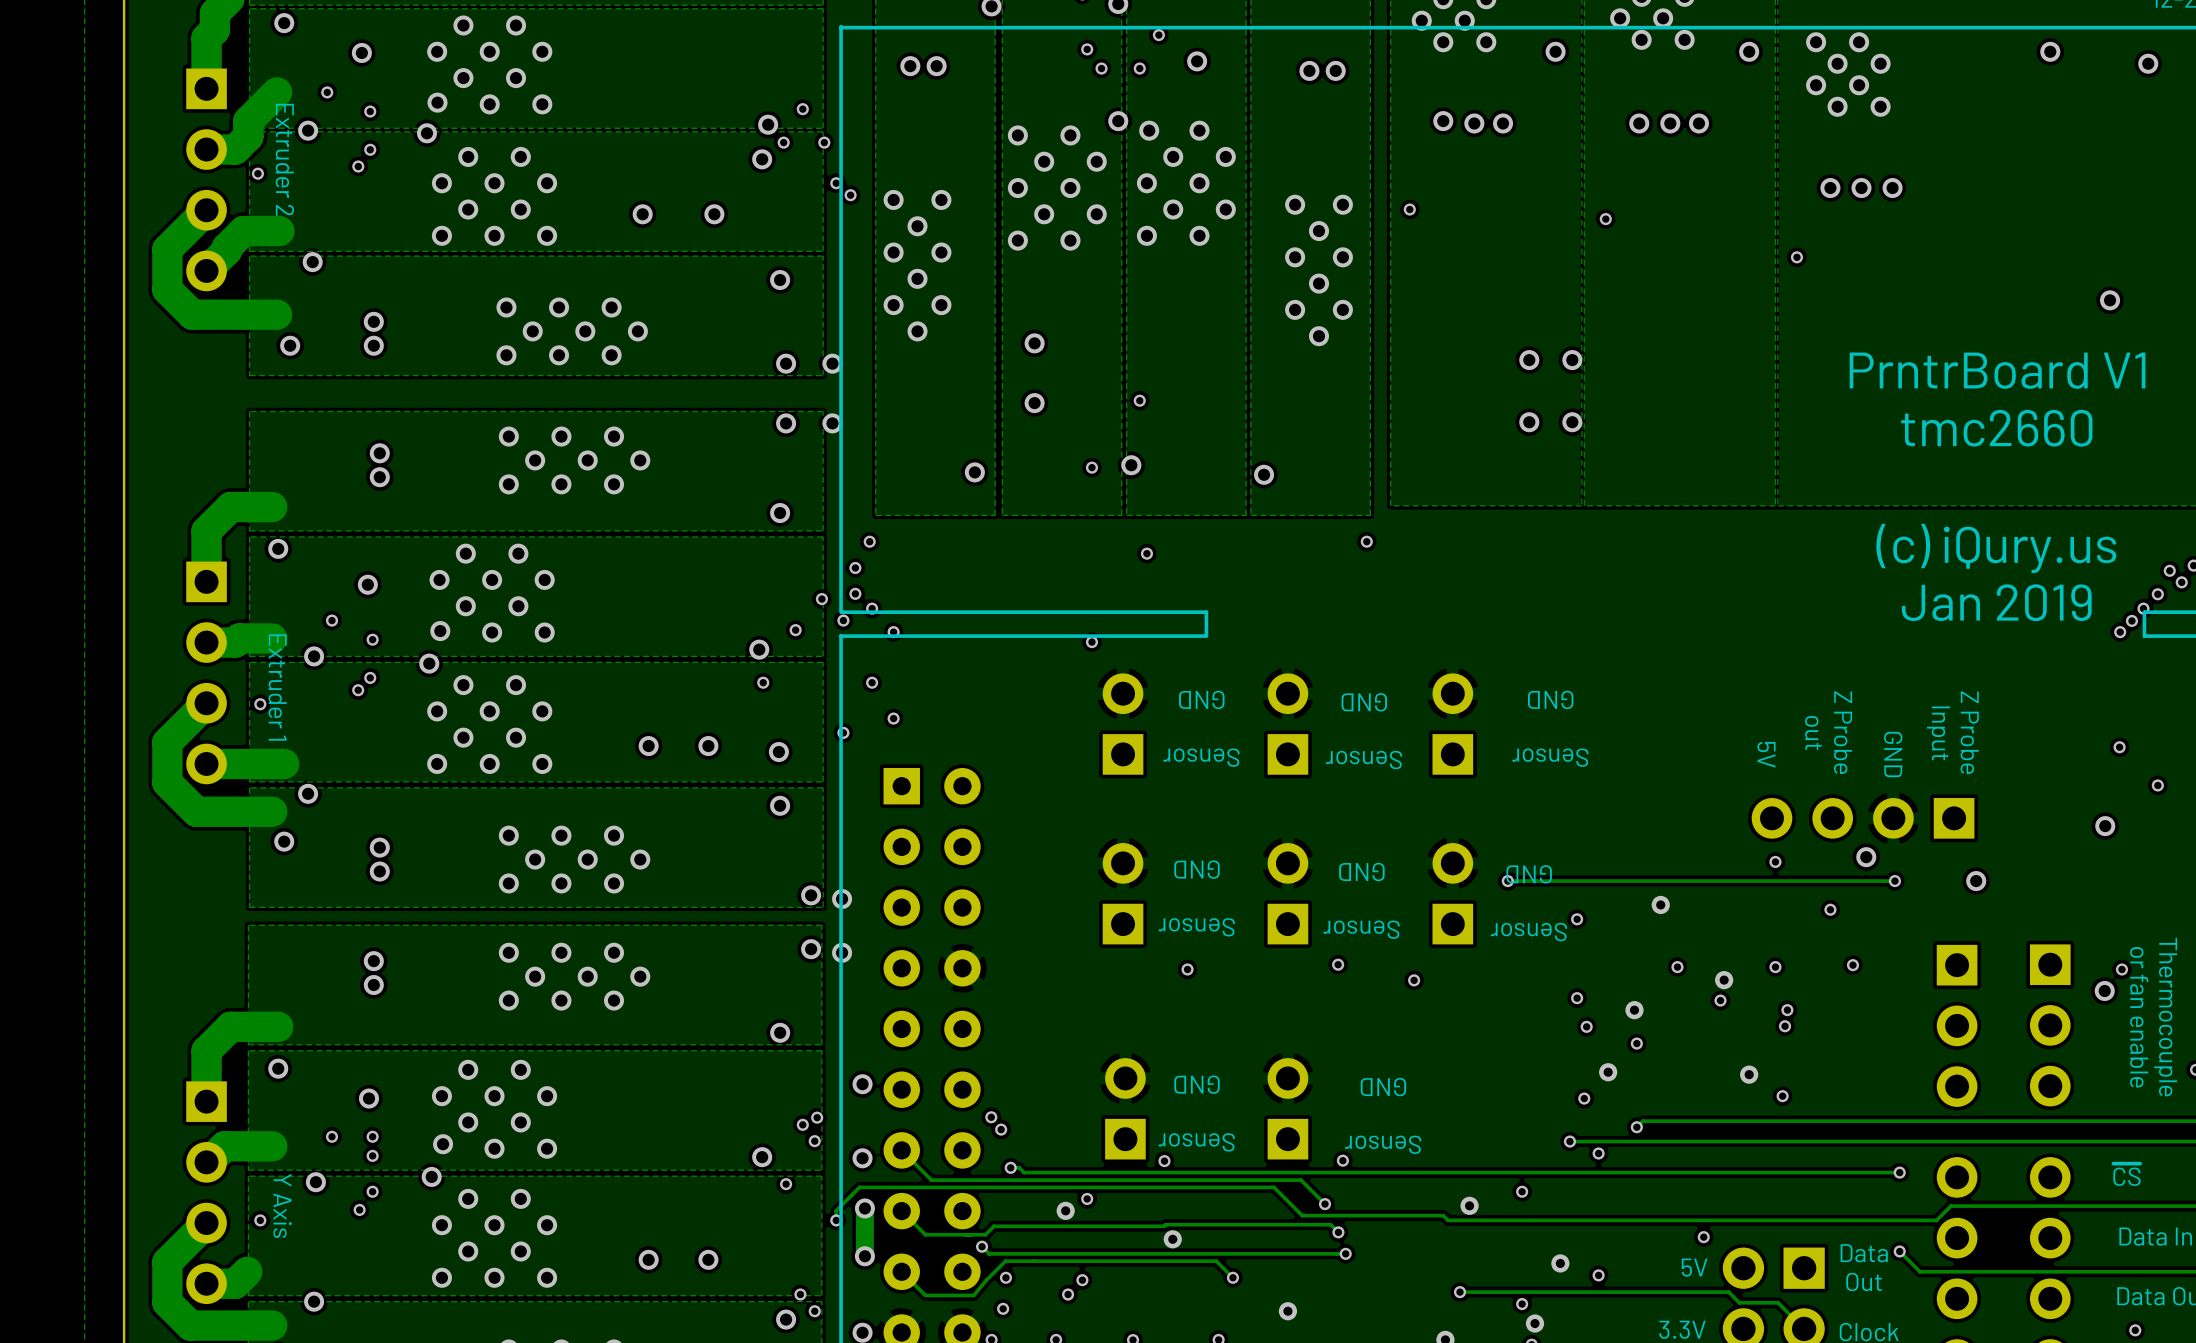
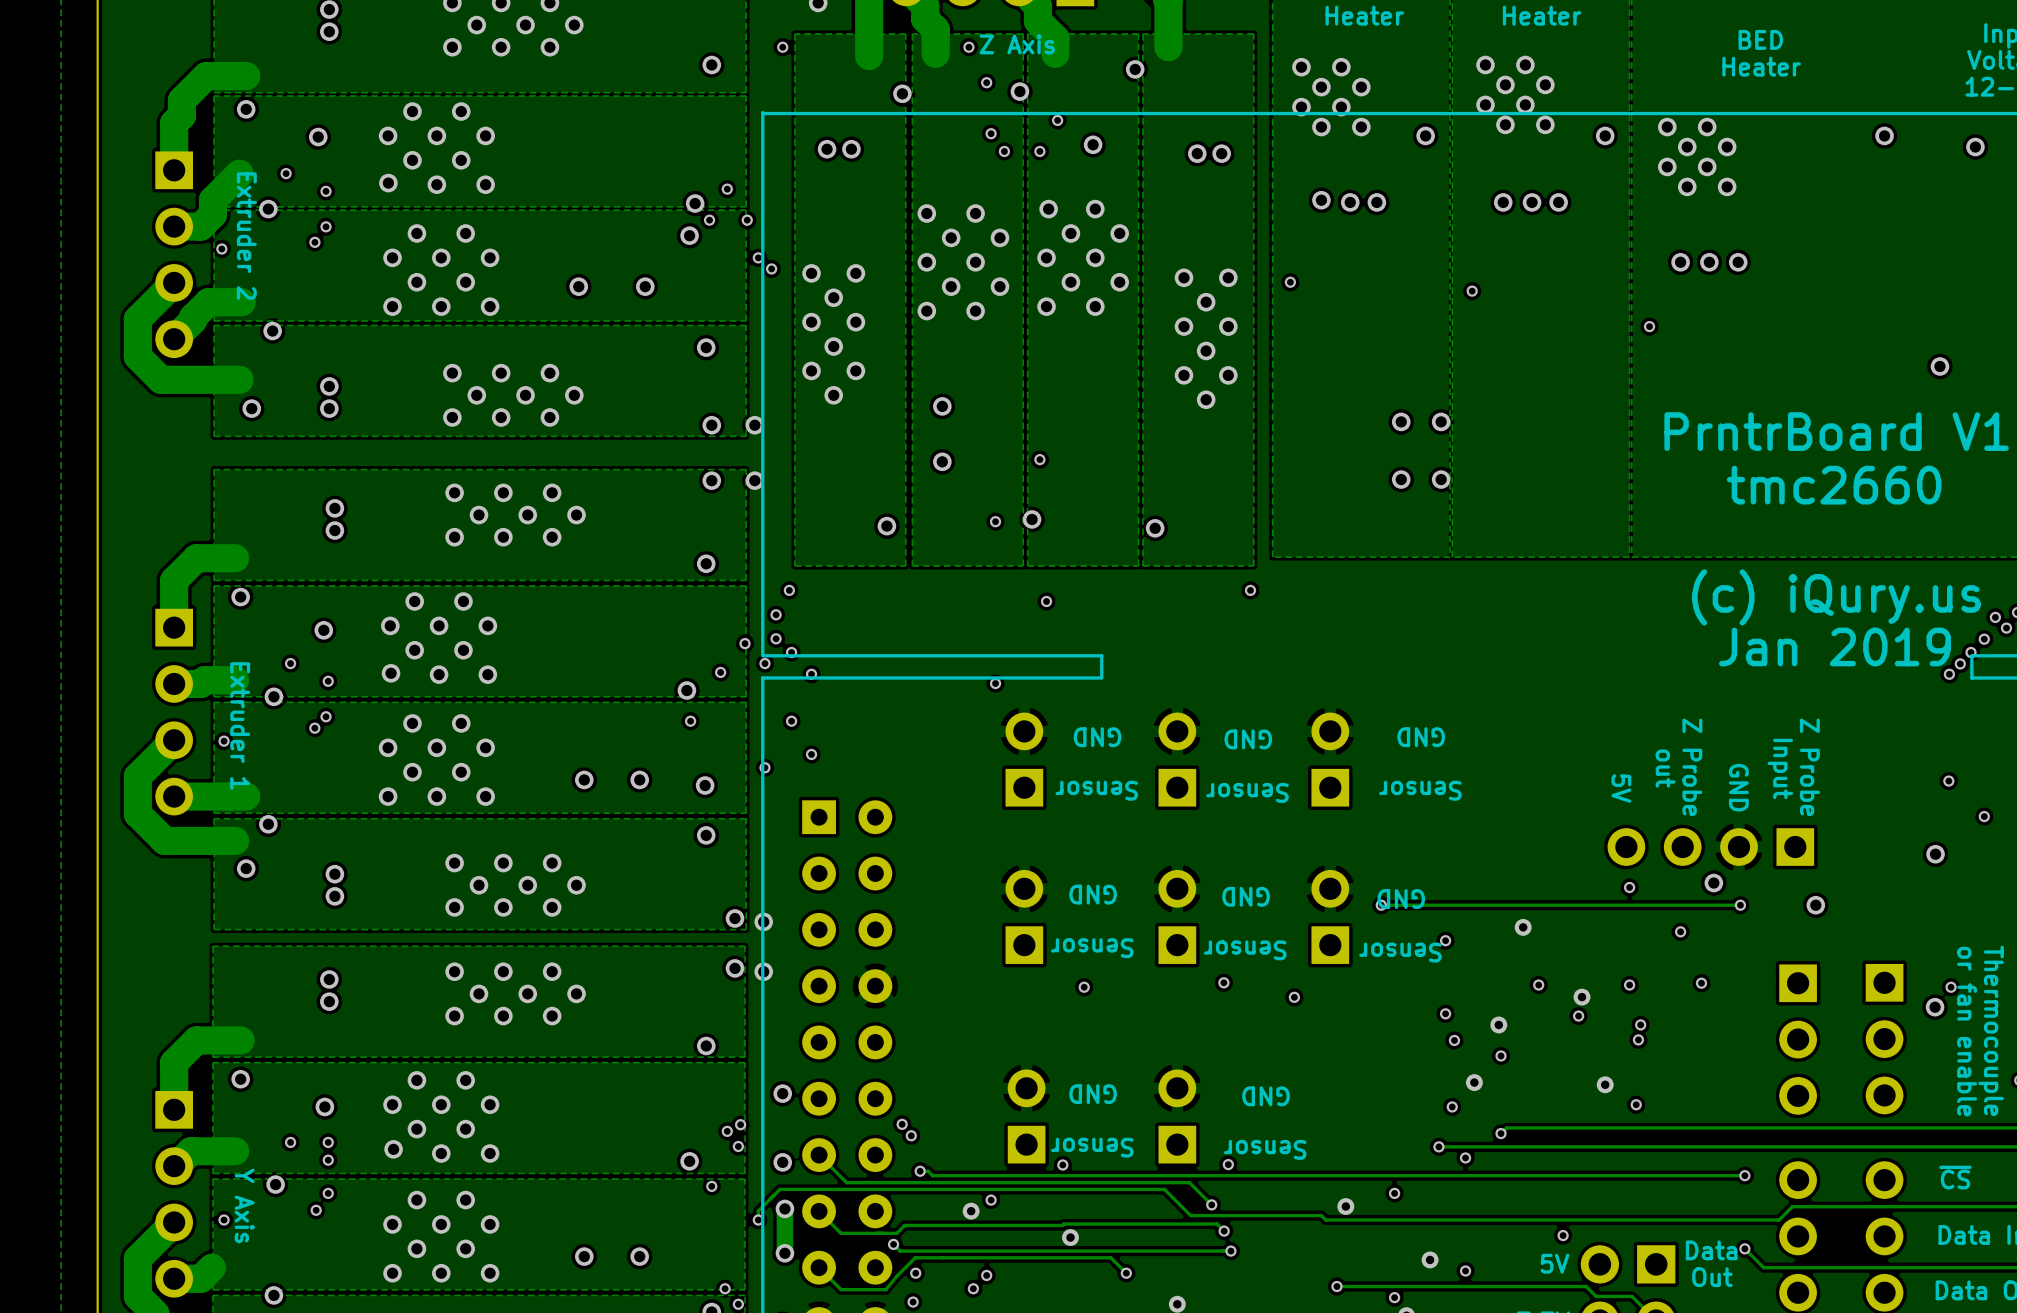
via: (1118, 121) -> none
via: (426, 133) -> none
via: (429, 663) -> none
via: (431, 1176) -> none

